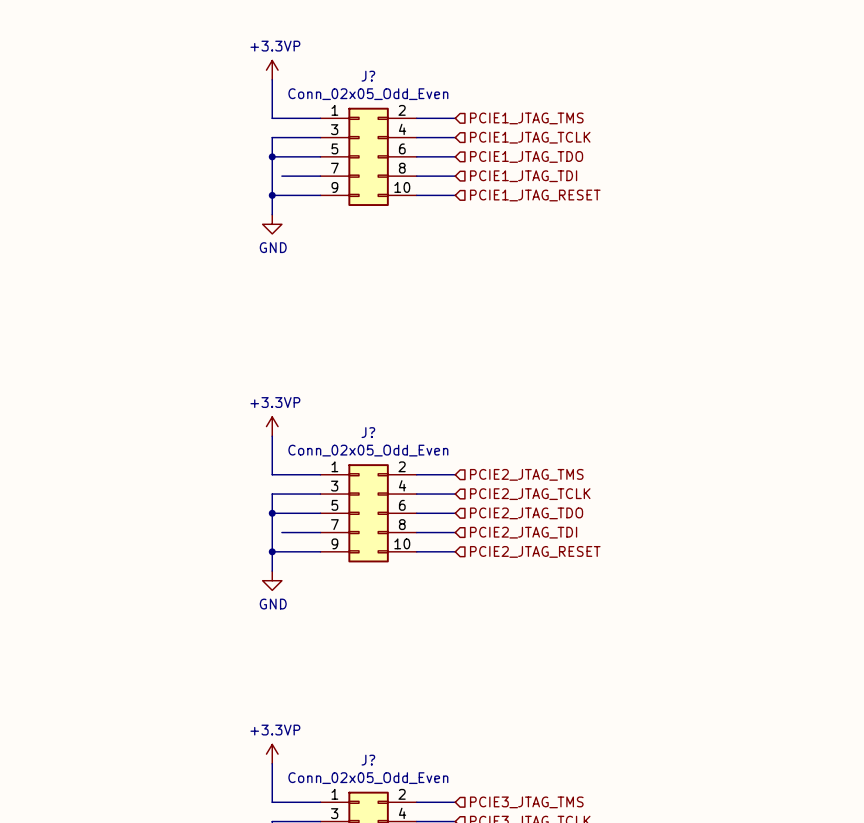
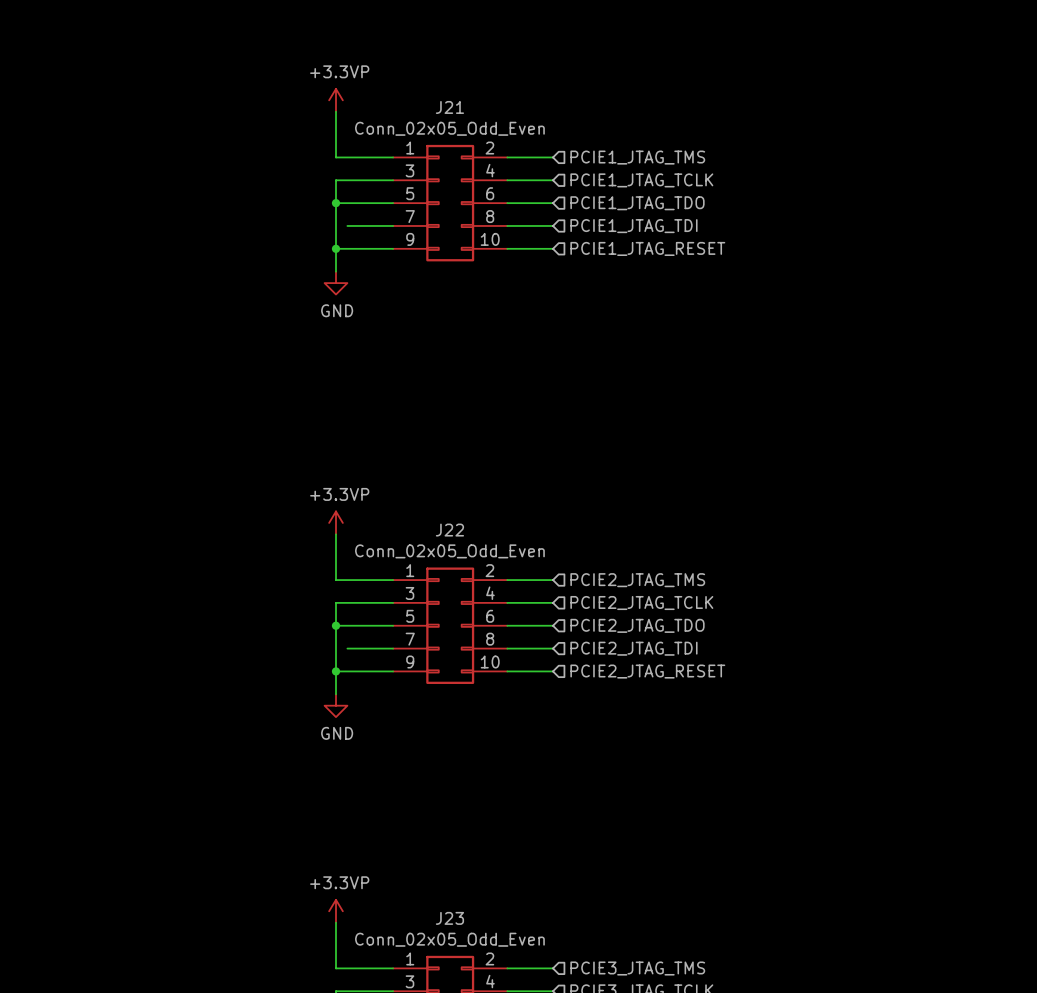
J? name: J? (368, 76) -> J21 (449, 107)
J? name: J? (368, 432) -> J22 (449, 530)
J? name: J? (368, 760) -> J23 (449, 918)

